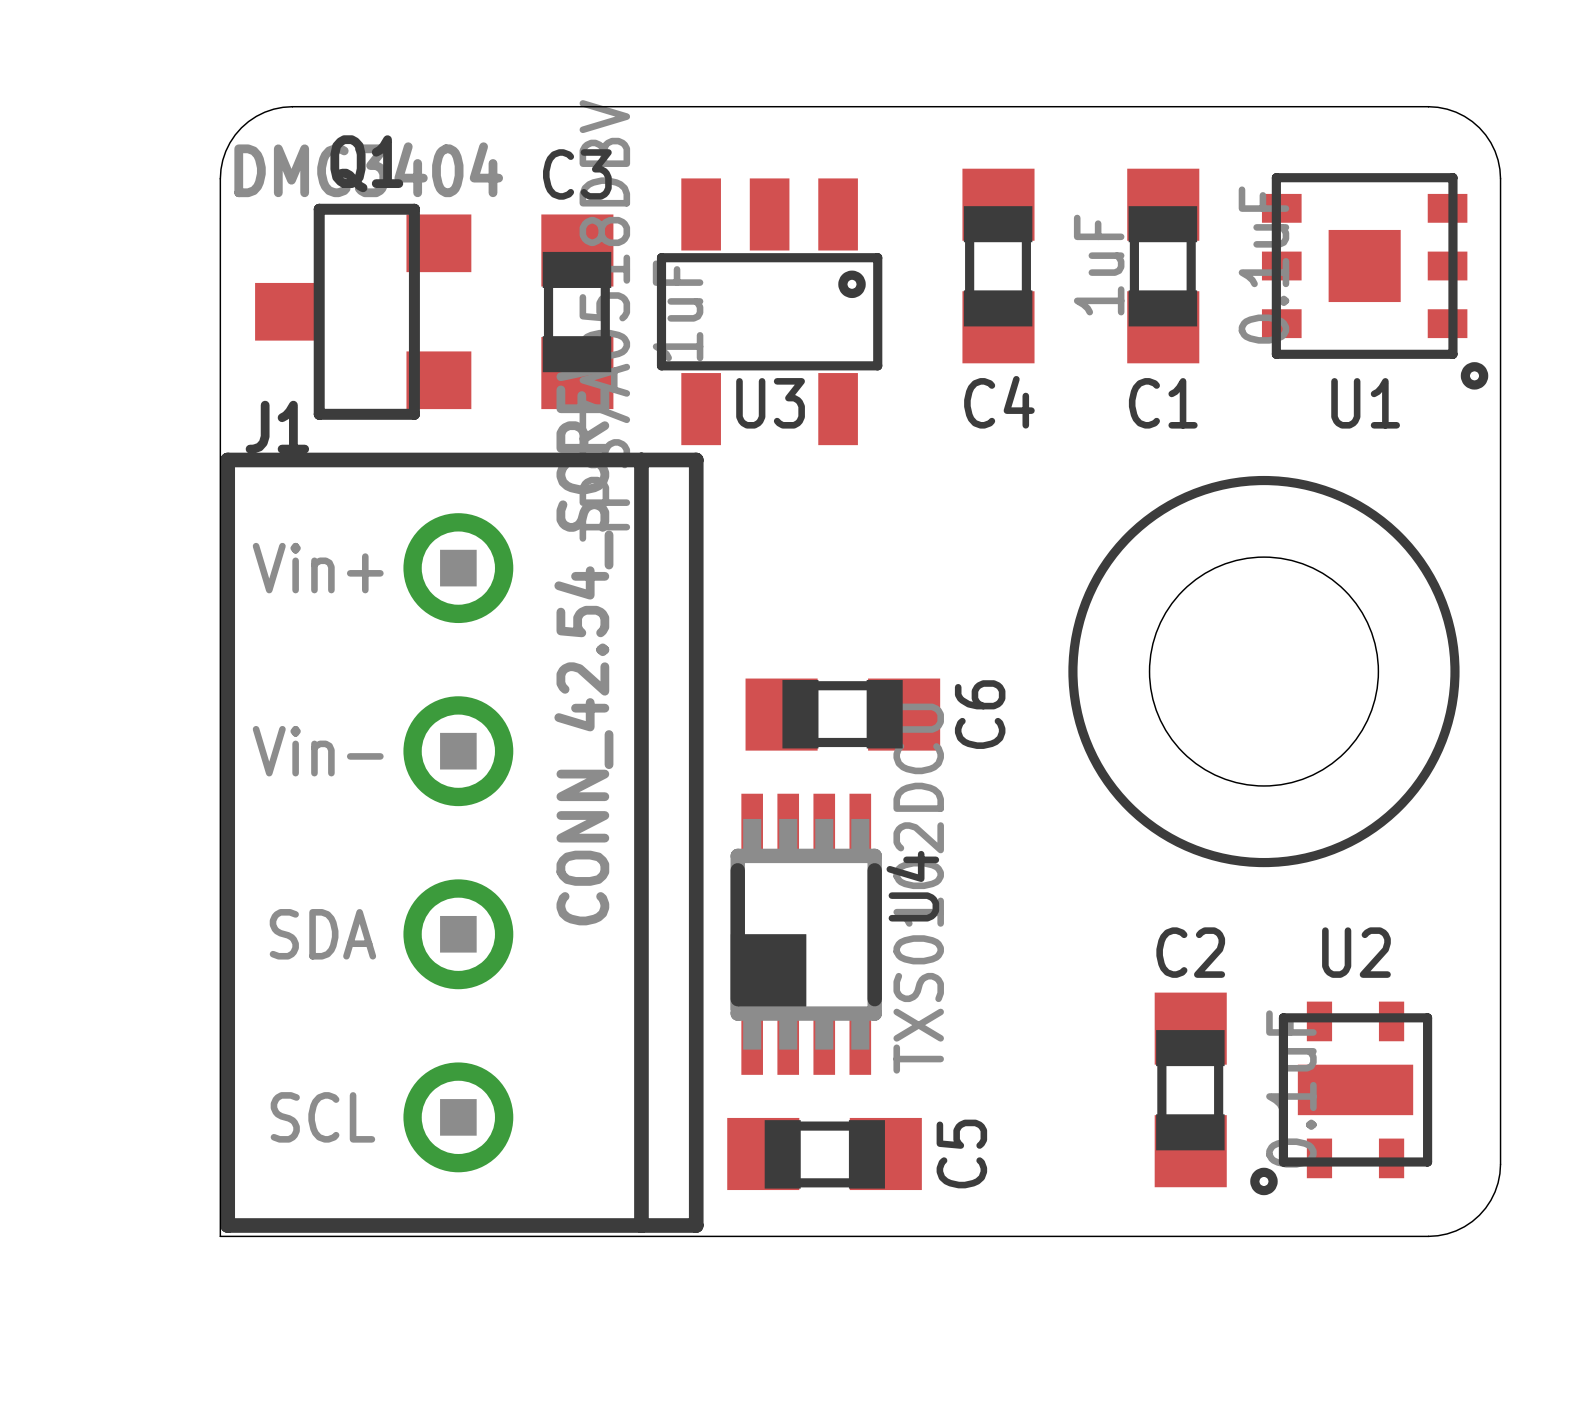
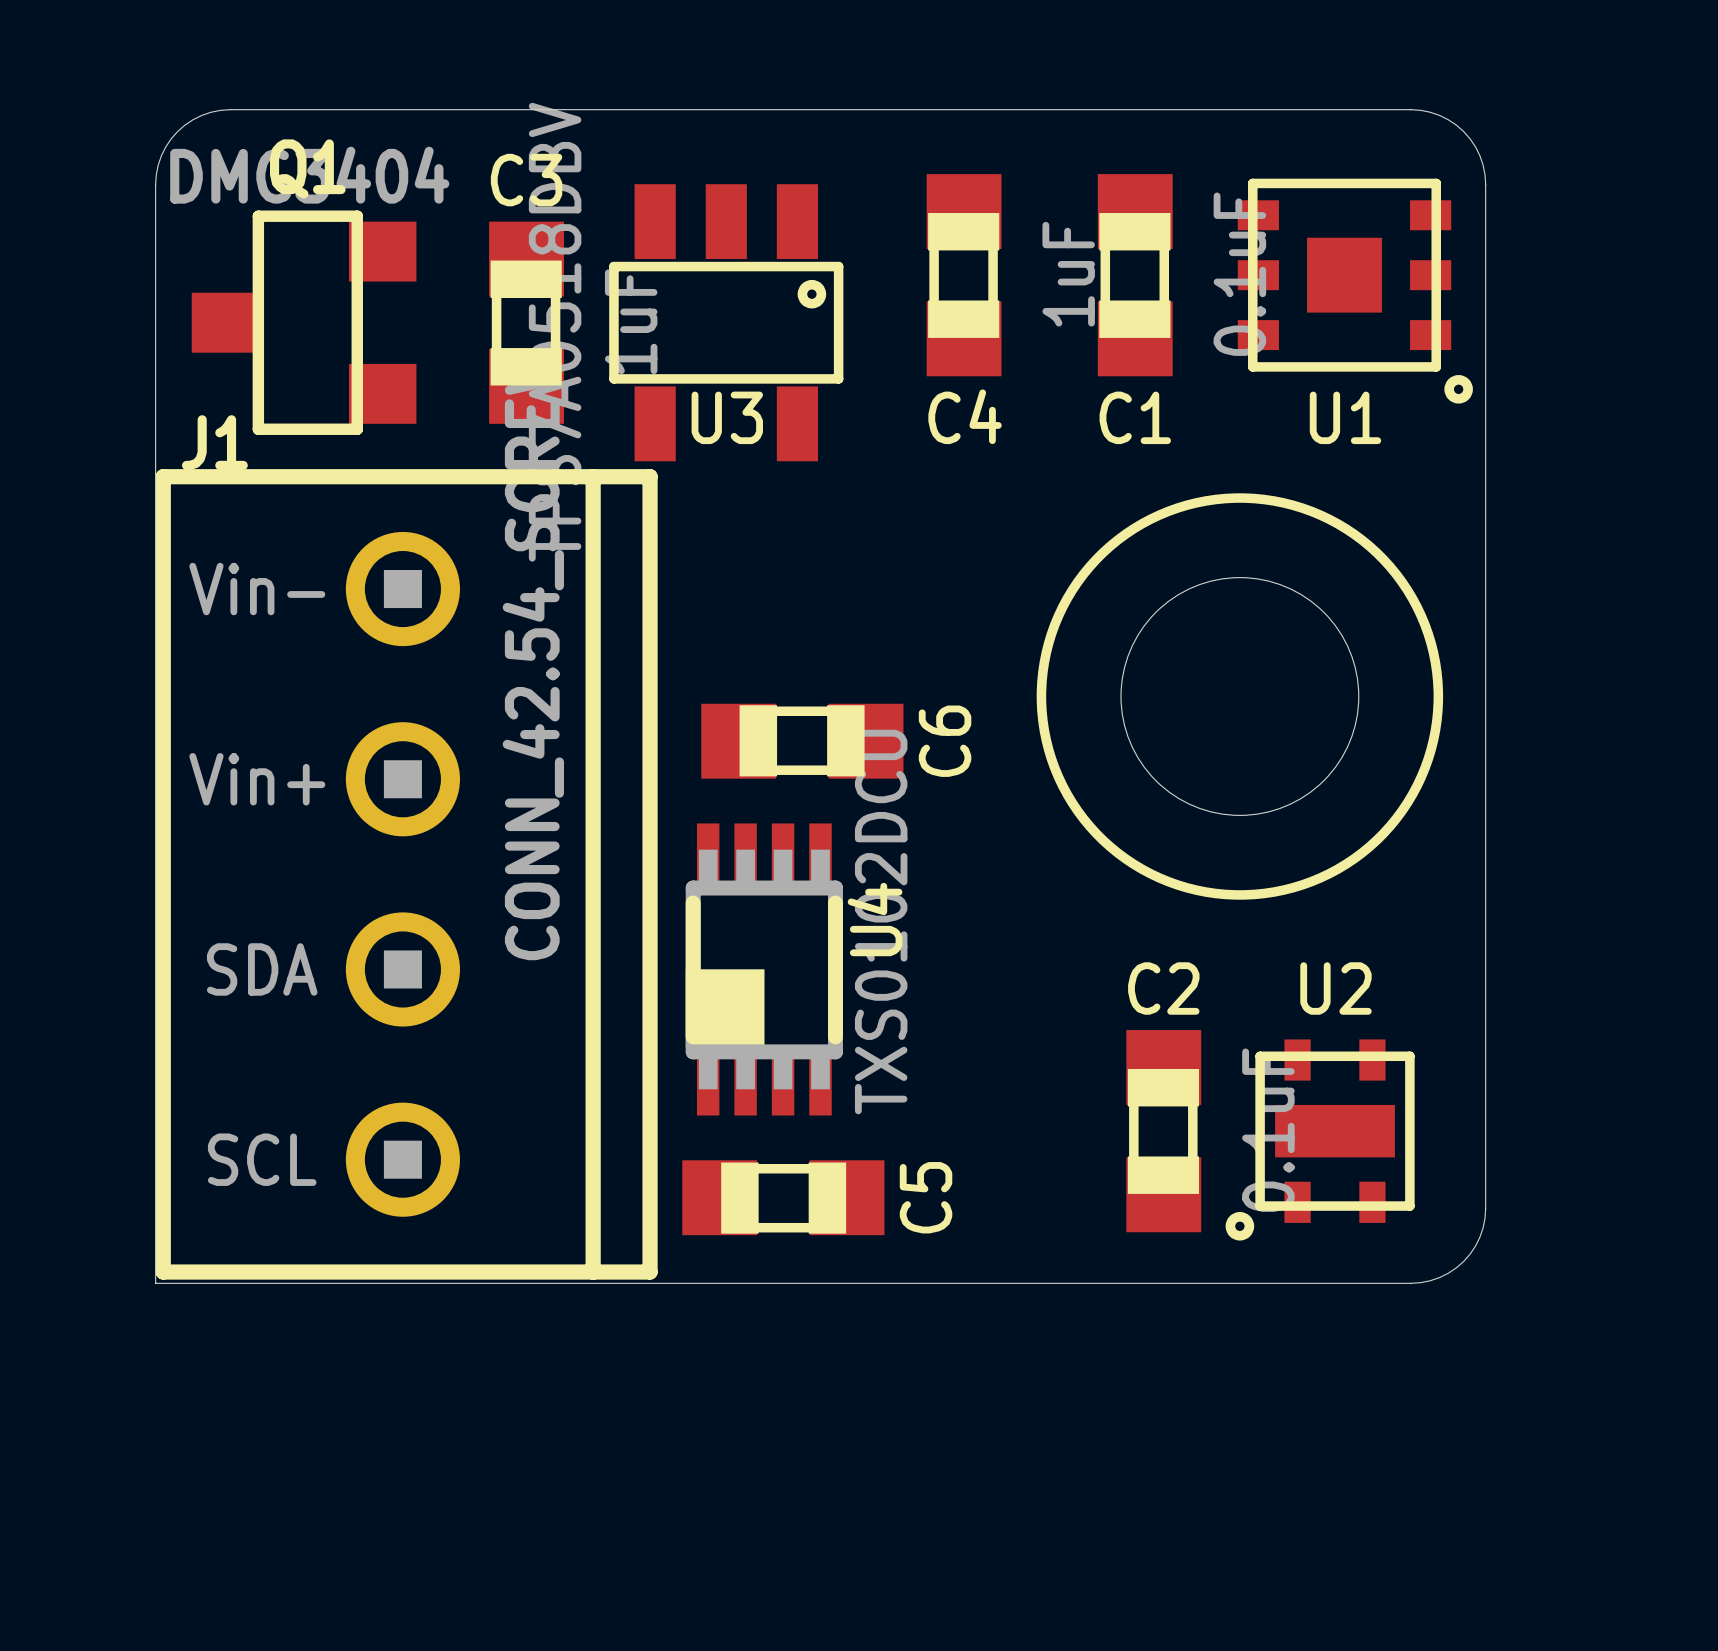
text: Vin+ (318, 568) -> Vin- (257, 589)
text: Vin- (318, 751) -> Vin+ (257, 779)

